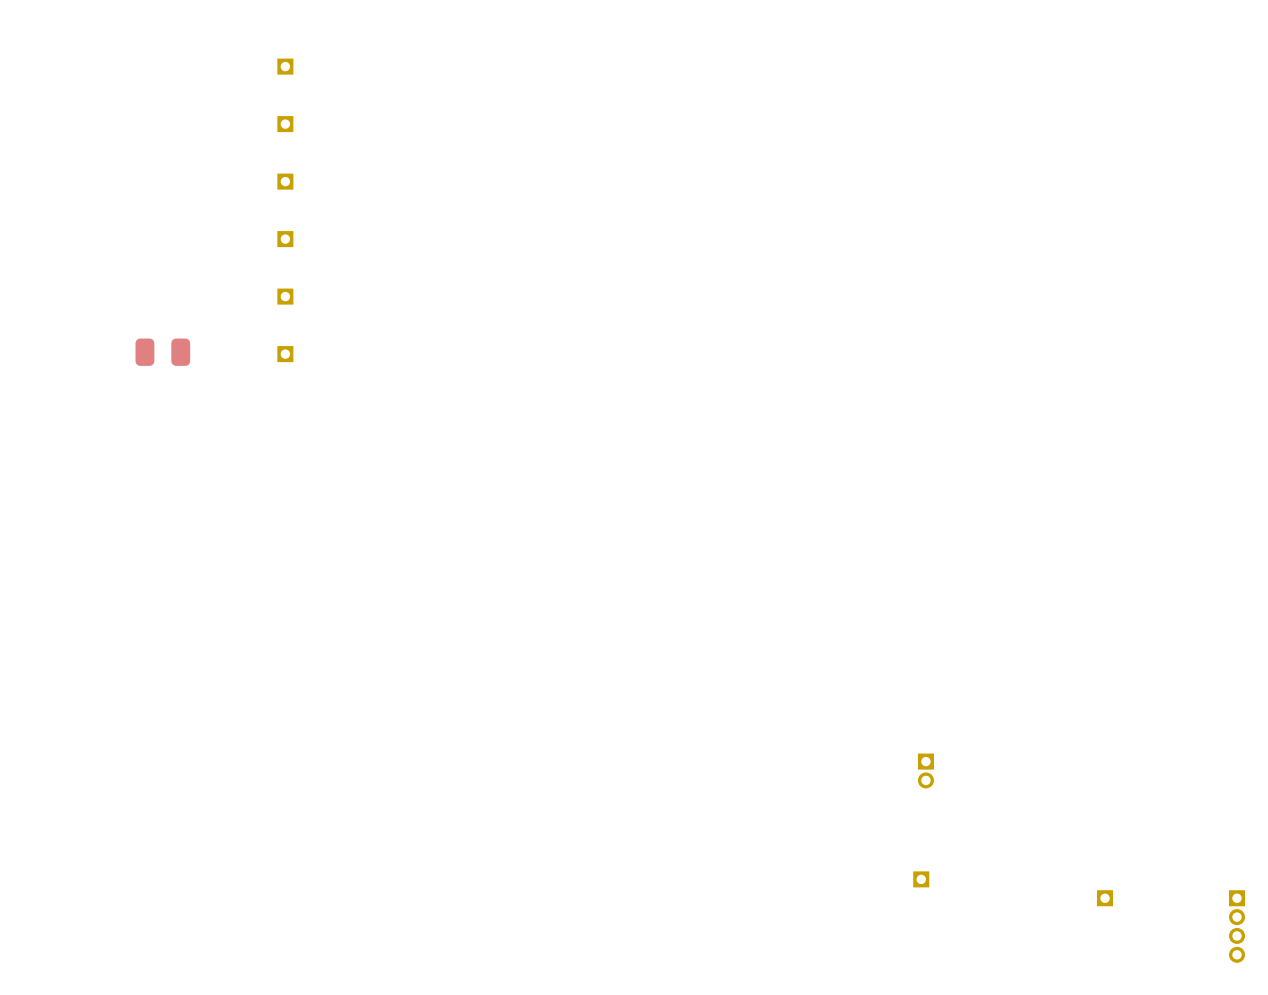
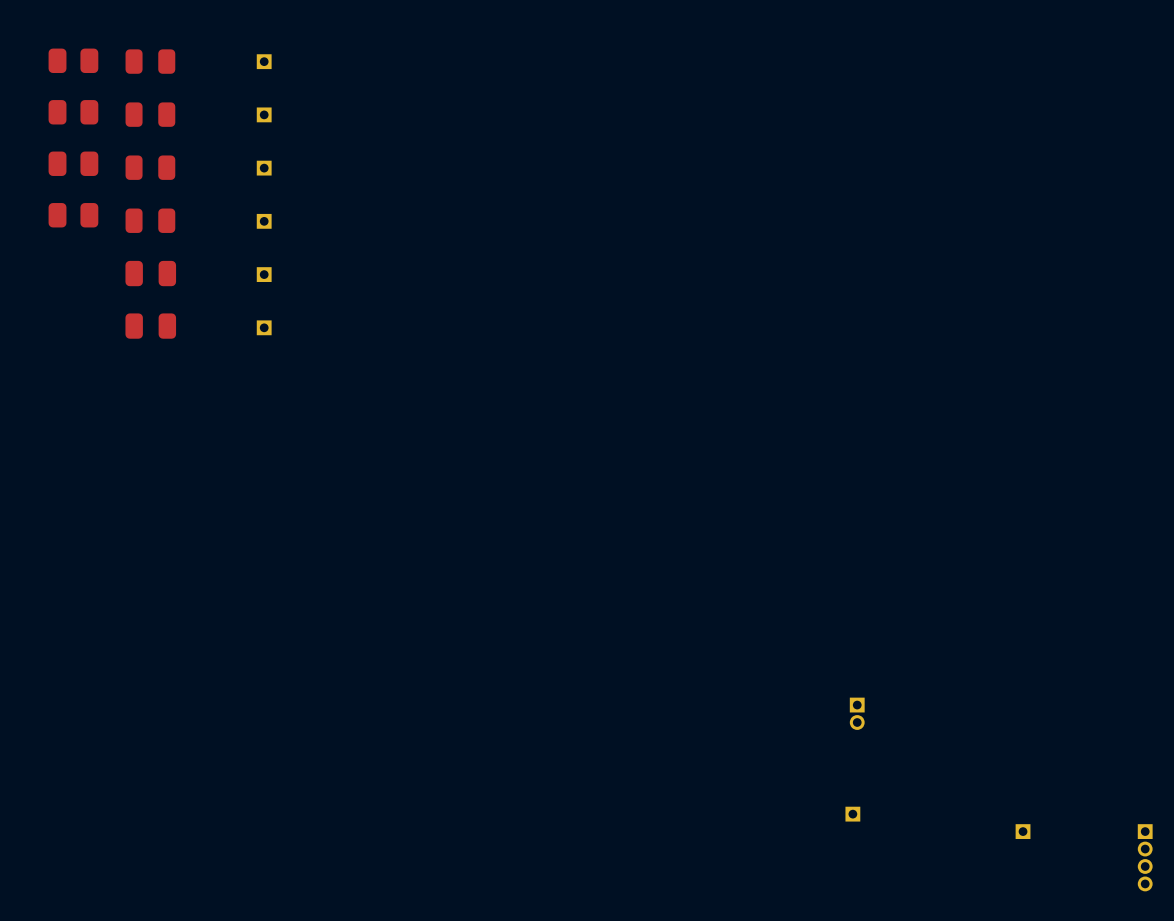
part: none -> (73, 60)
part: none -> (150, 61)
part: none -> (73, 112)
part: none -> (150, 114)
part: none -> (73, 163)
part: none -> (150, 167)
part: none -> (73, 215)
part: none -> (150, 220)
part: none -> (150, 273)

